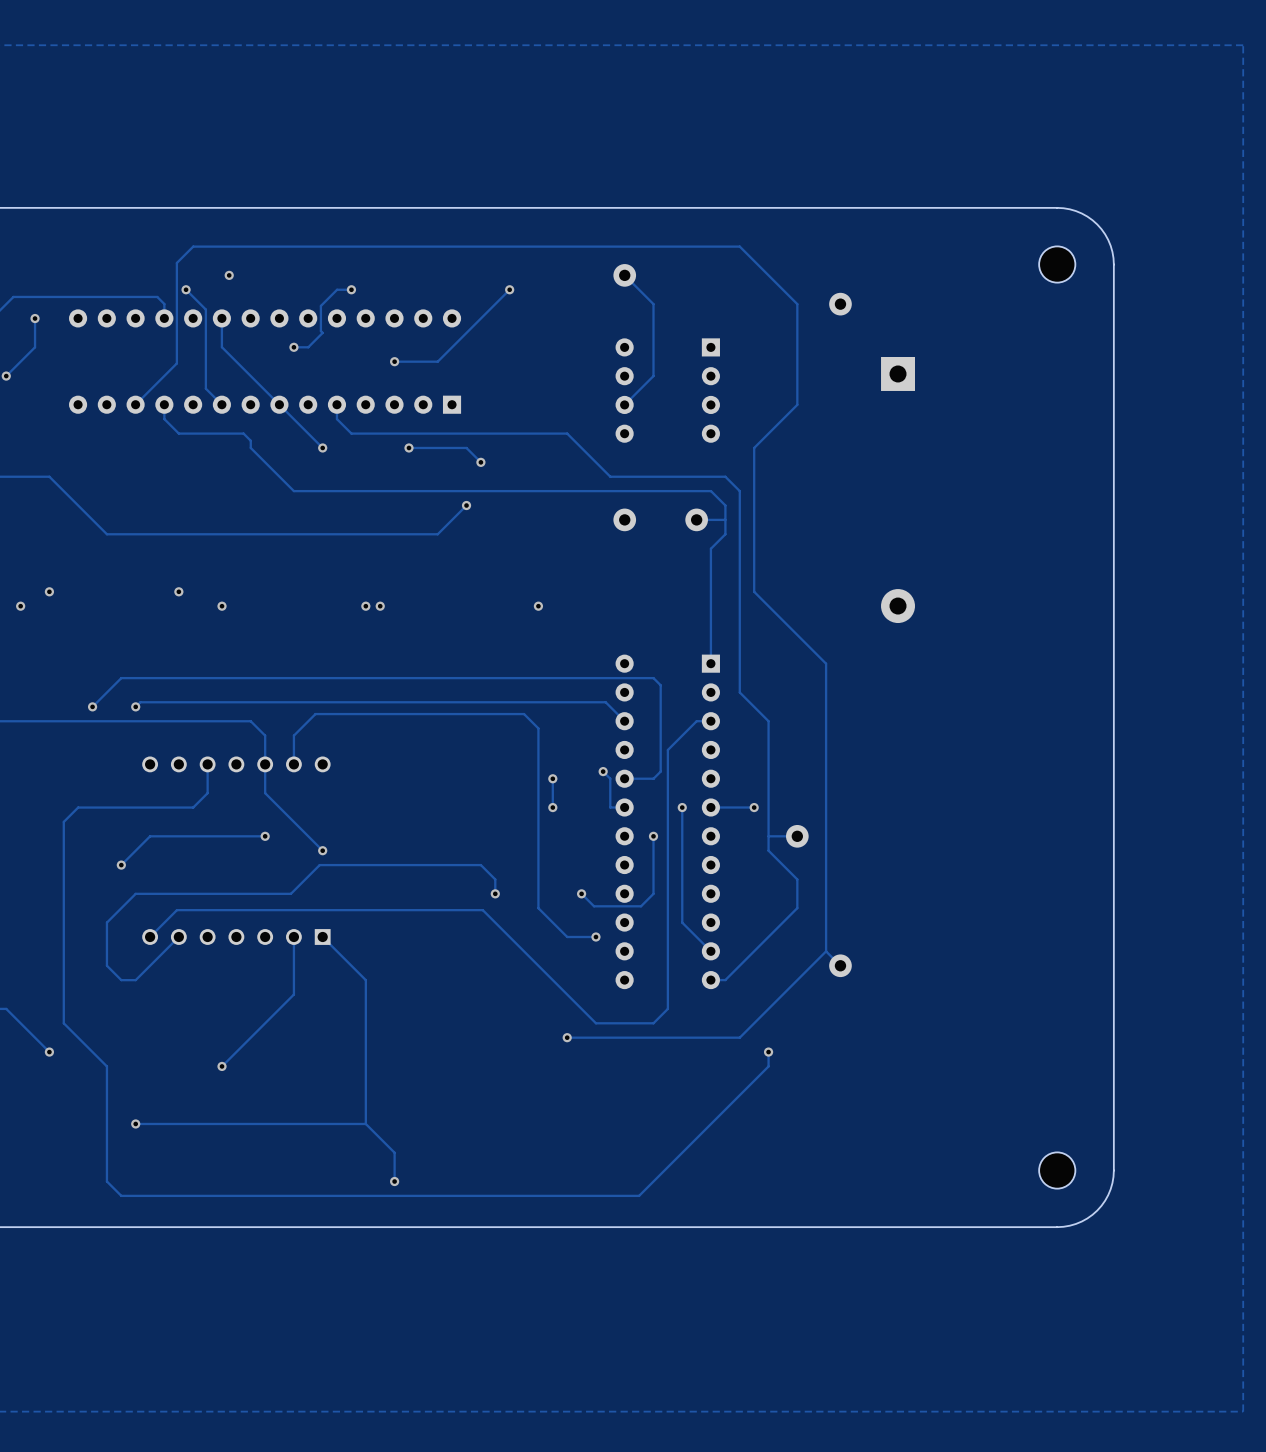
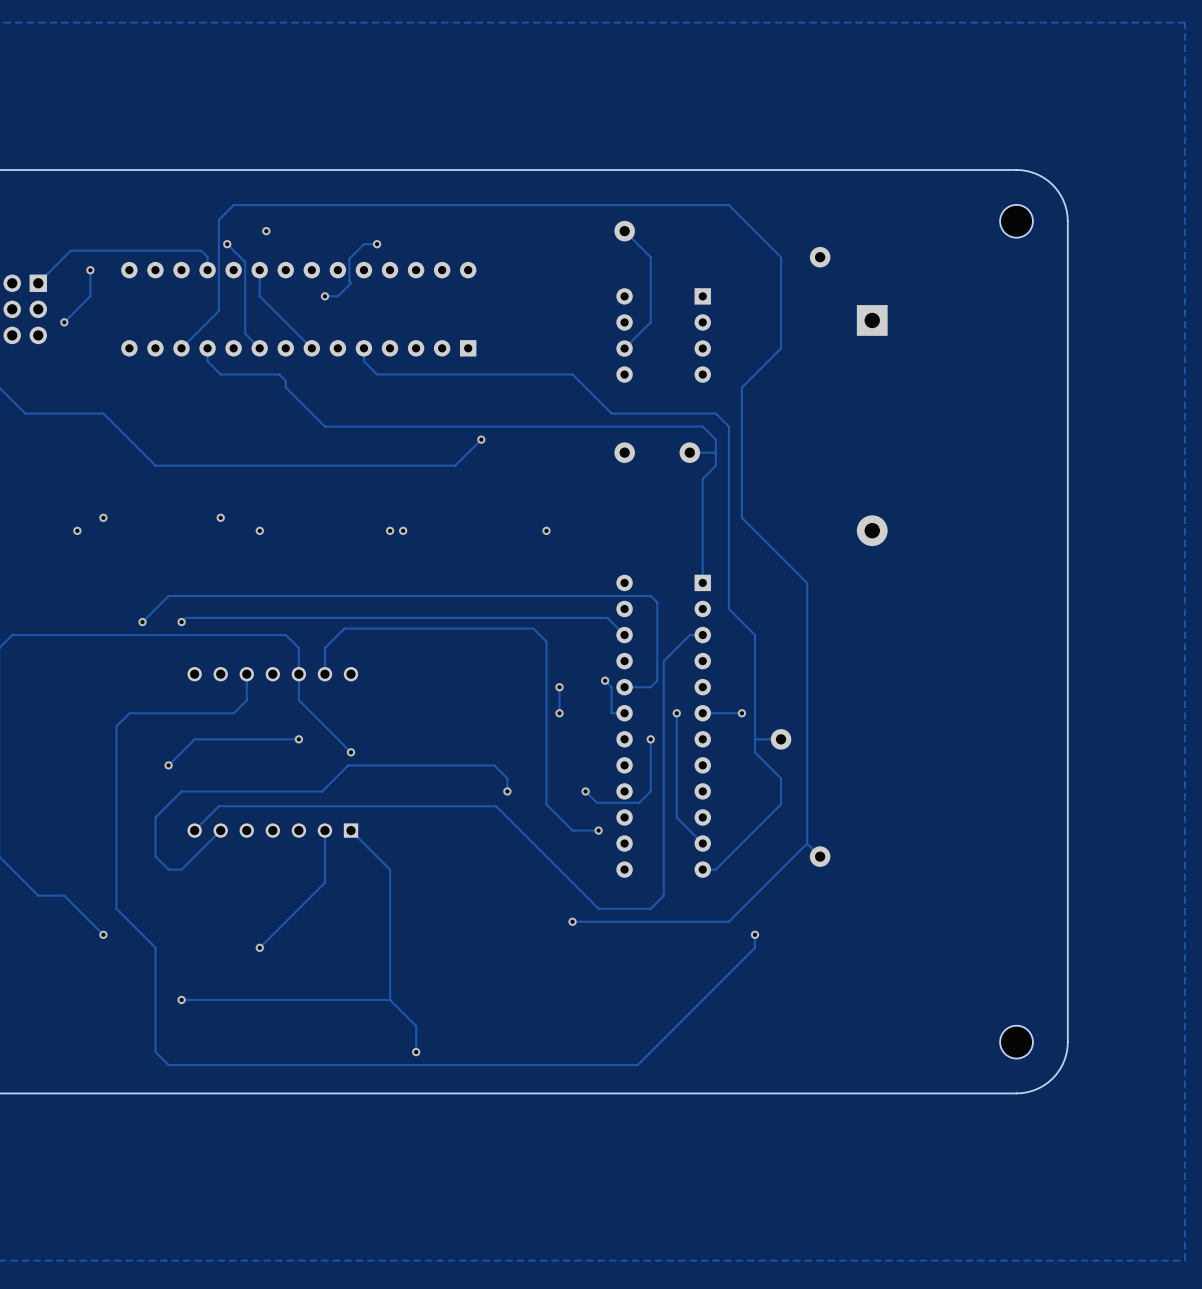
track: (509, 289) (437, 361) (394, 361) -> none
via: (509, 289) -> none
via: (394, 361) -> none
track: (279, 404) (322, 447) -> none
via: (322, 447) -> none
track: (408, 447) (466, 447) (480, 462) -> none
via: (408, 447) -> none
via: (480, 462) -> none

